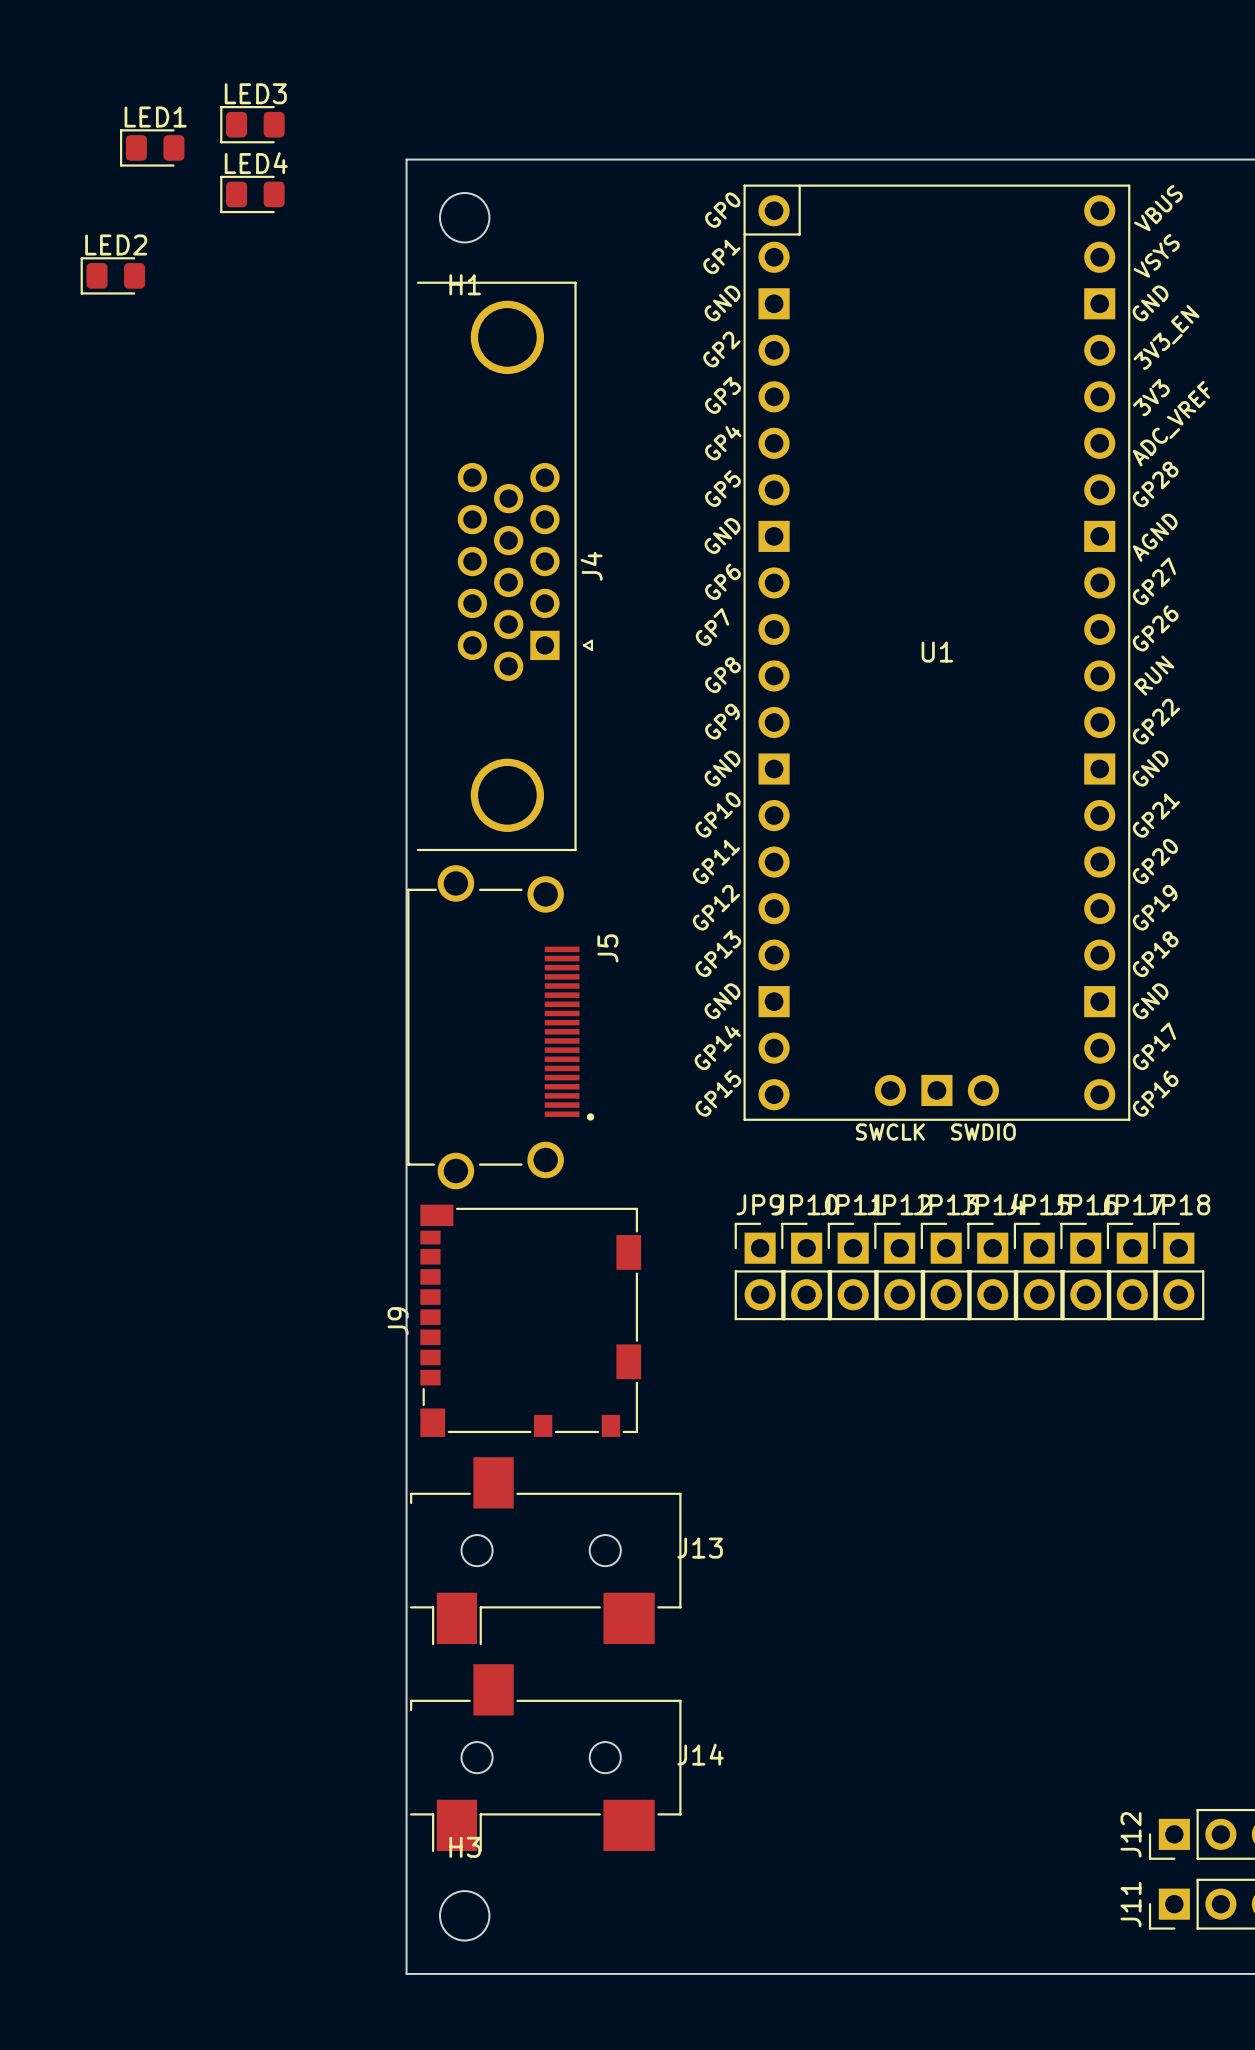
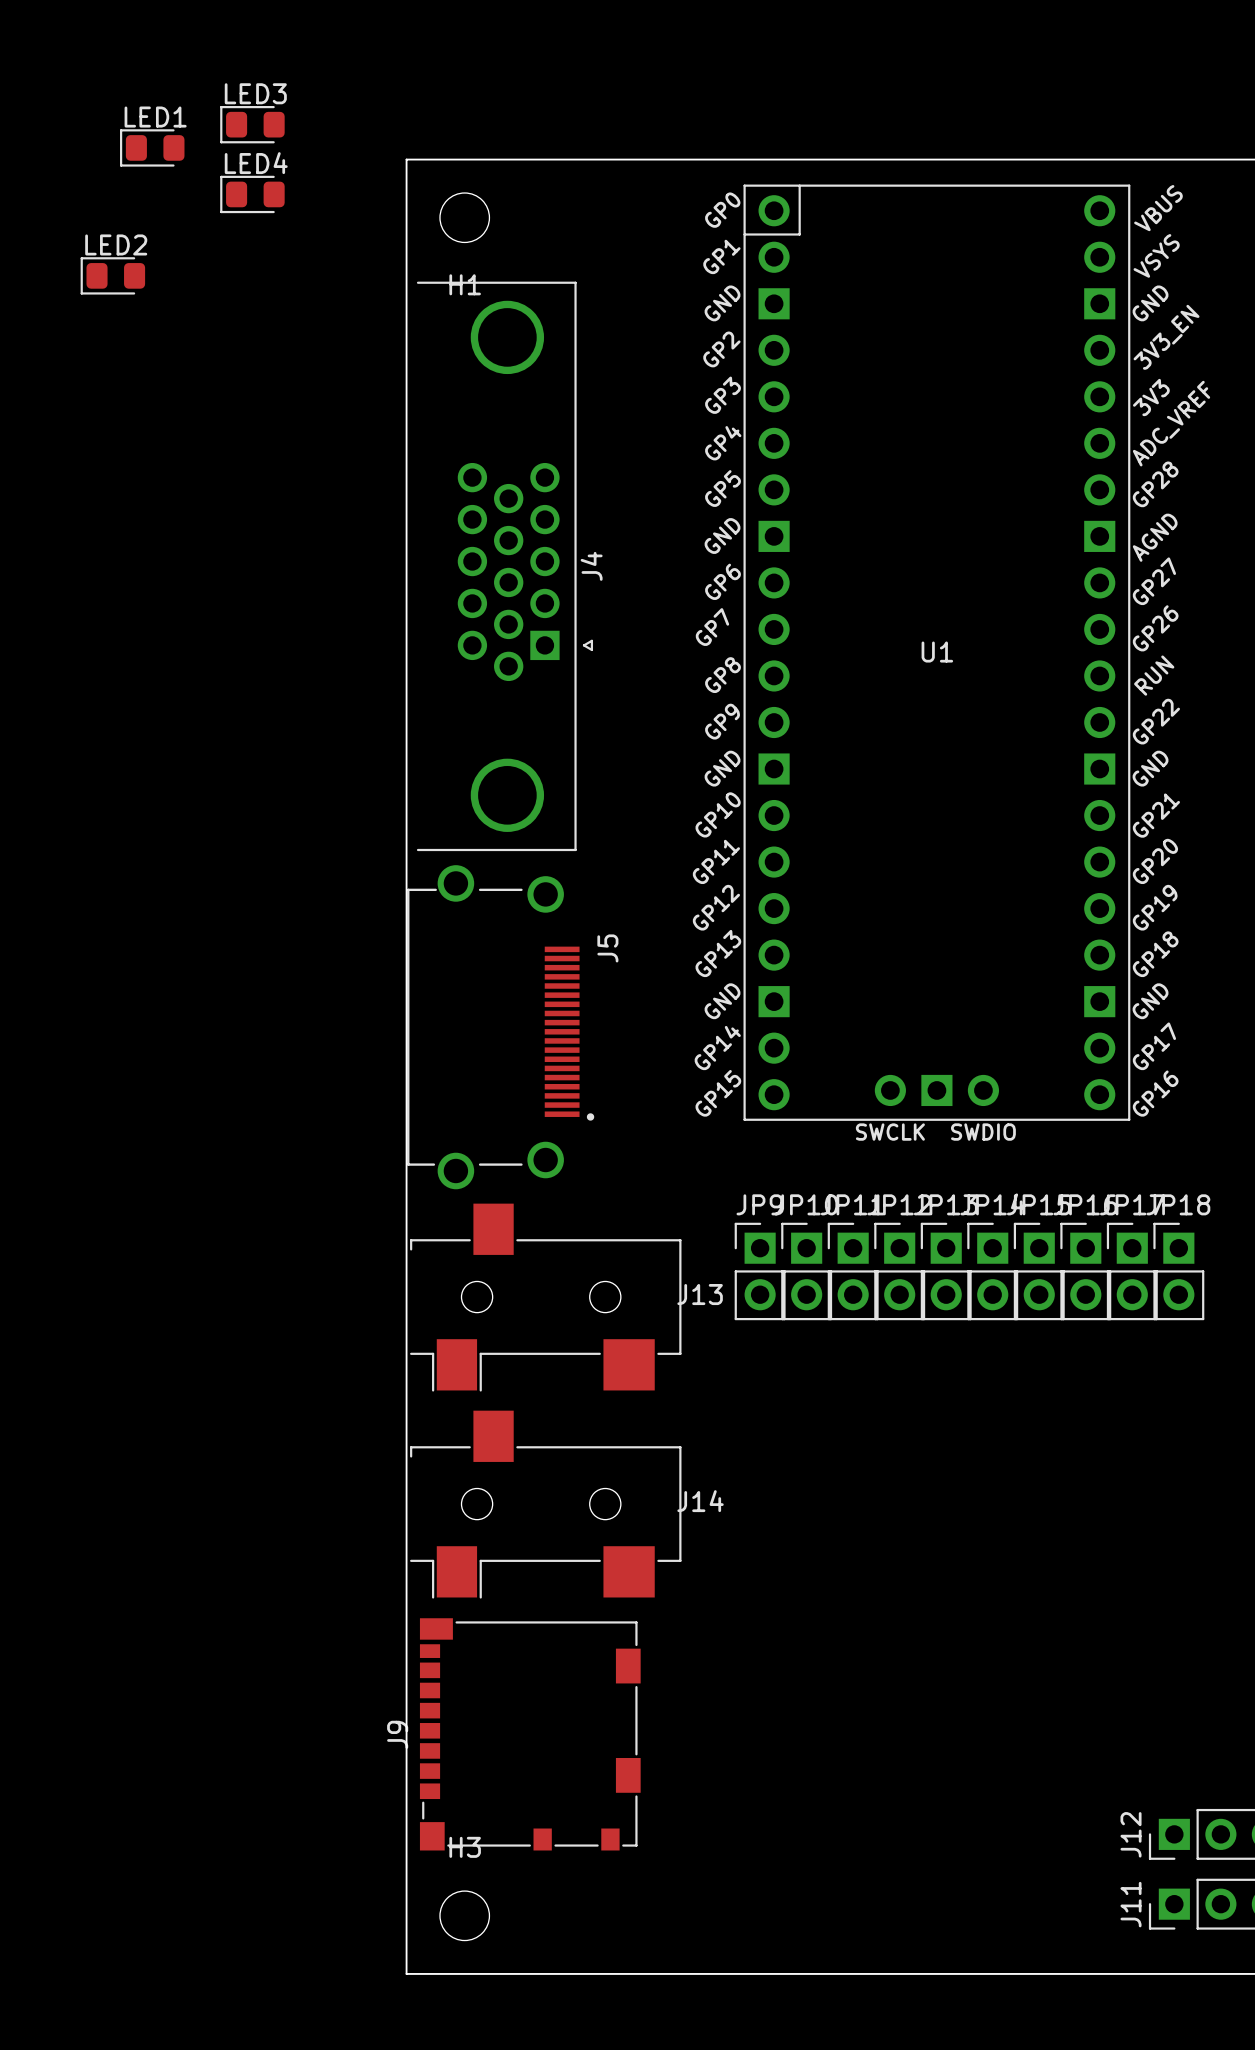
J9 position: (530, 1320) -> (530, 1734)
J13 position: (545, 1551) -> (545, 1297)
J14 position: (545, 1758) -> (545, 1504)

